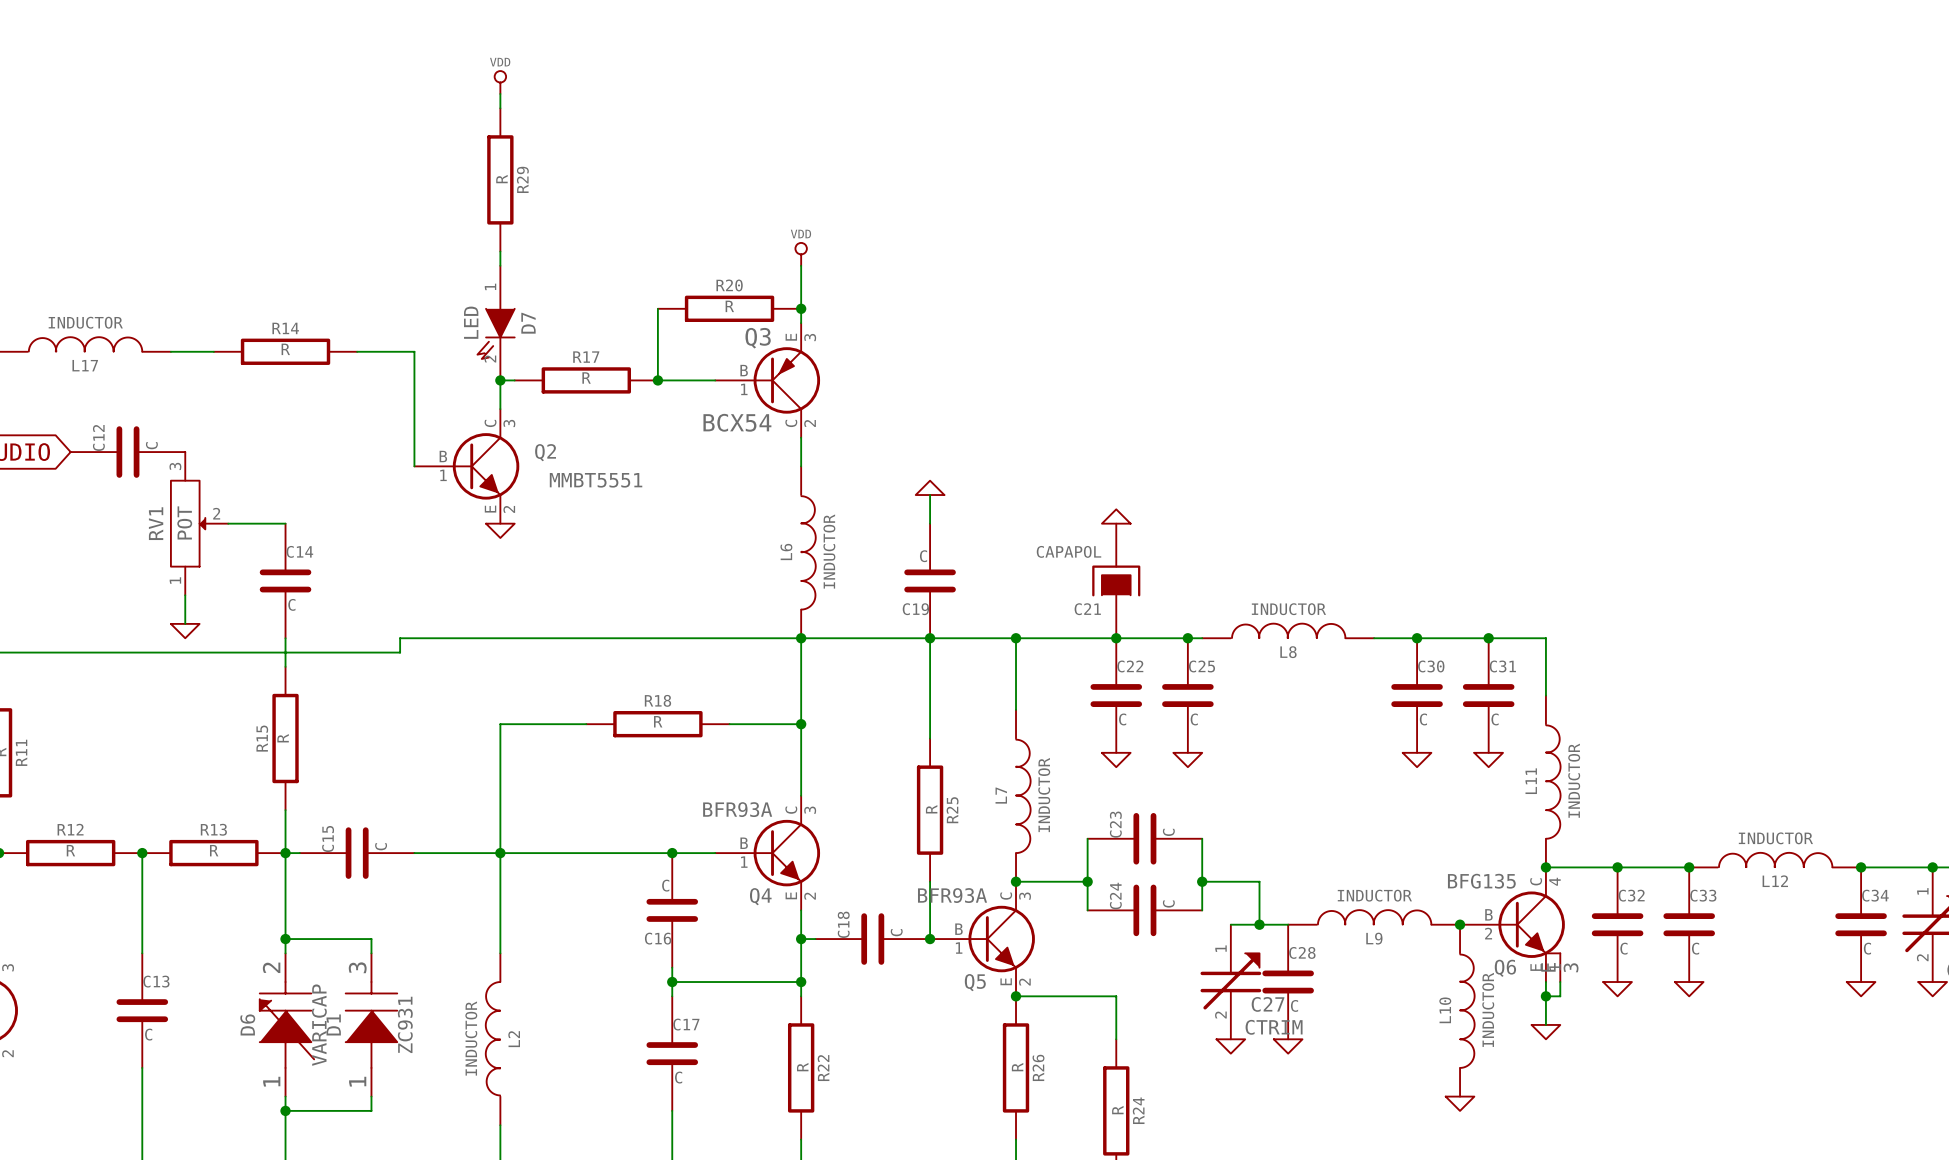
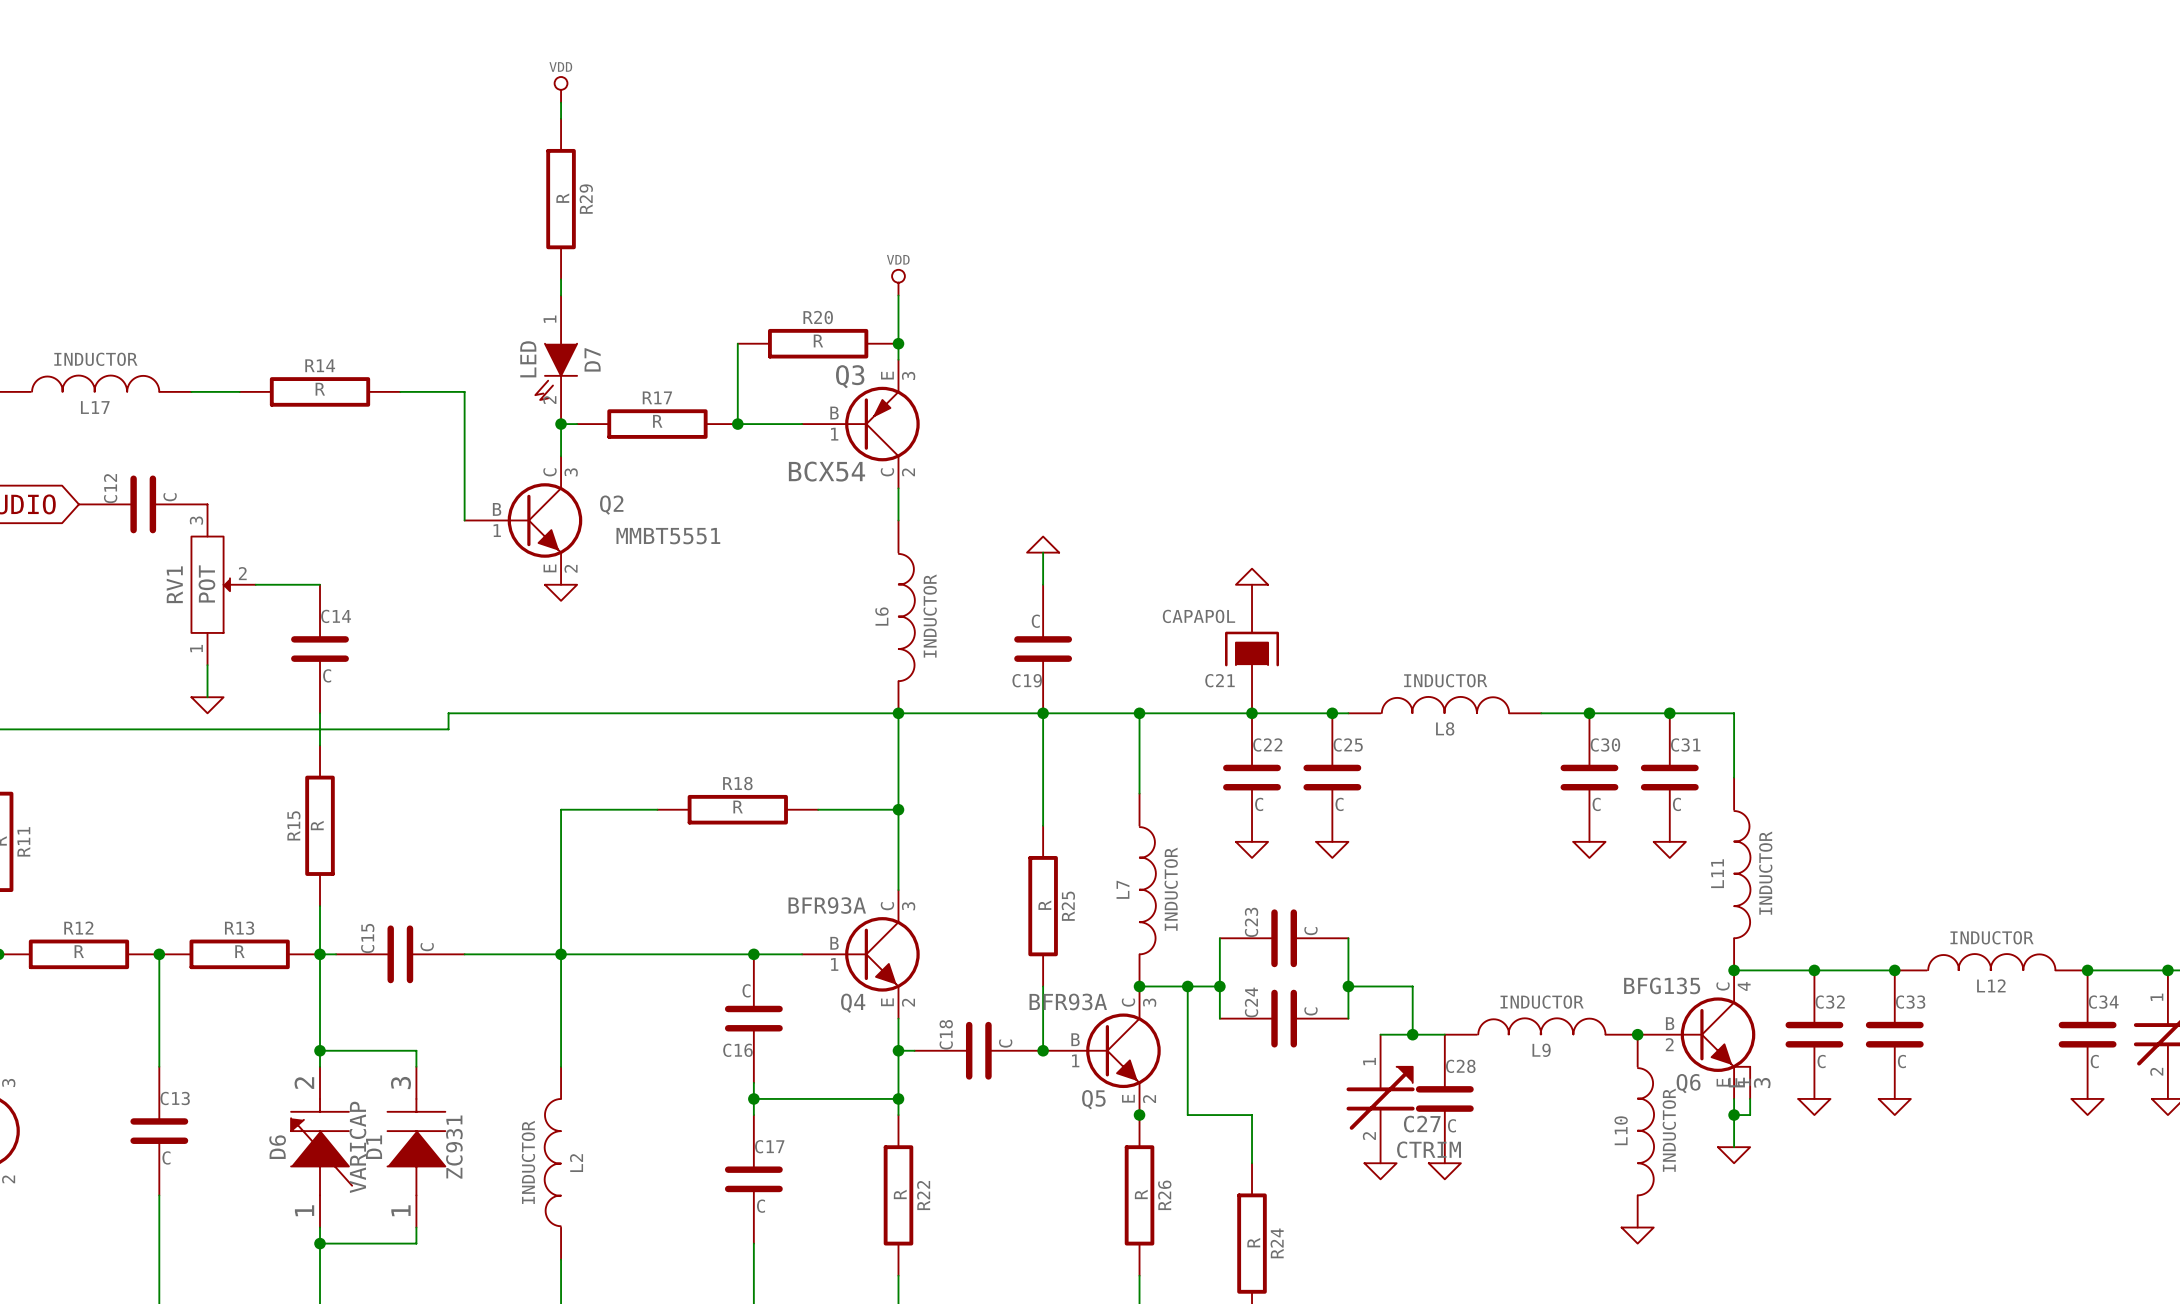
junction: none -> (1187, 986)
wire: (1016, 996) (1058, 996) -> (1187, 986) (1187, 1115)

